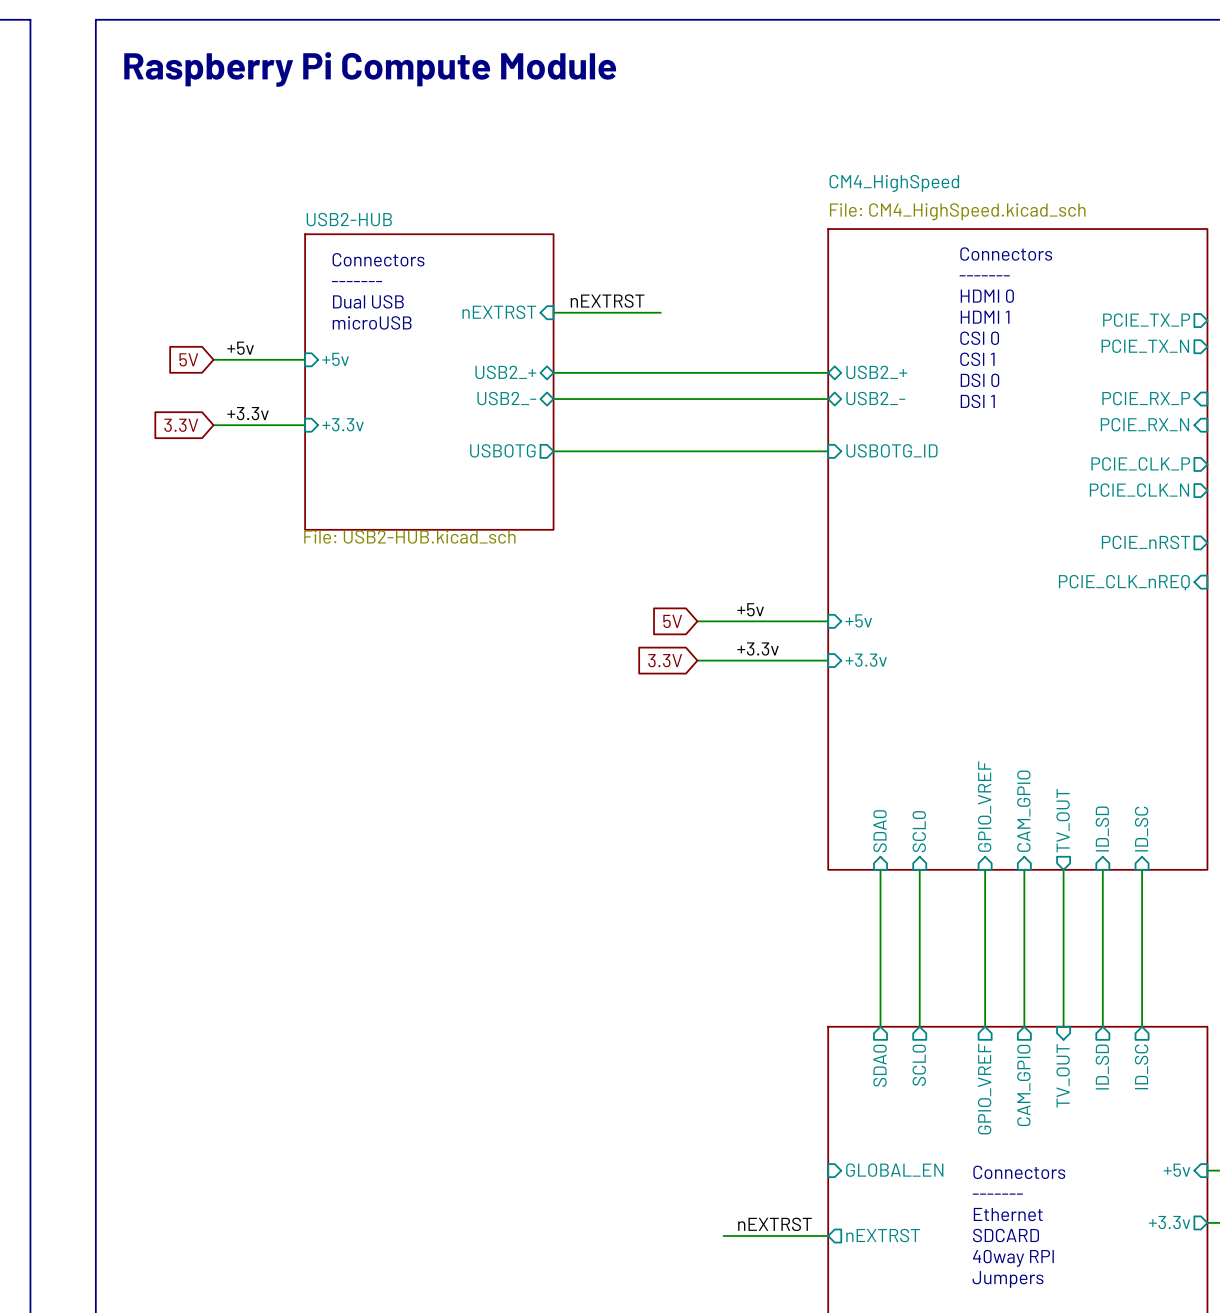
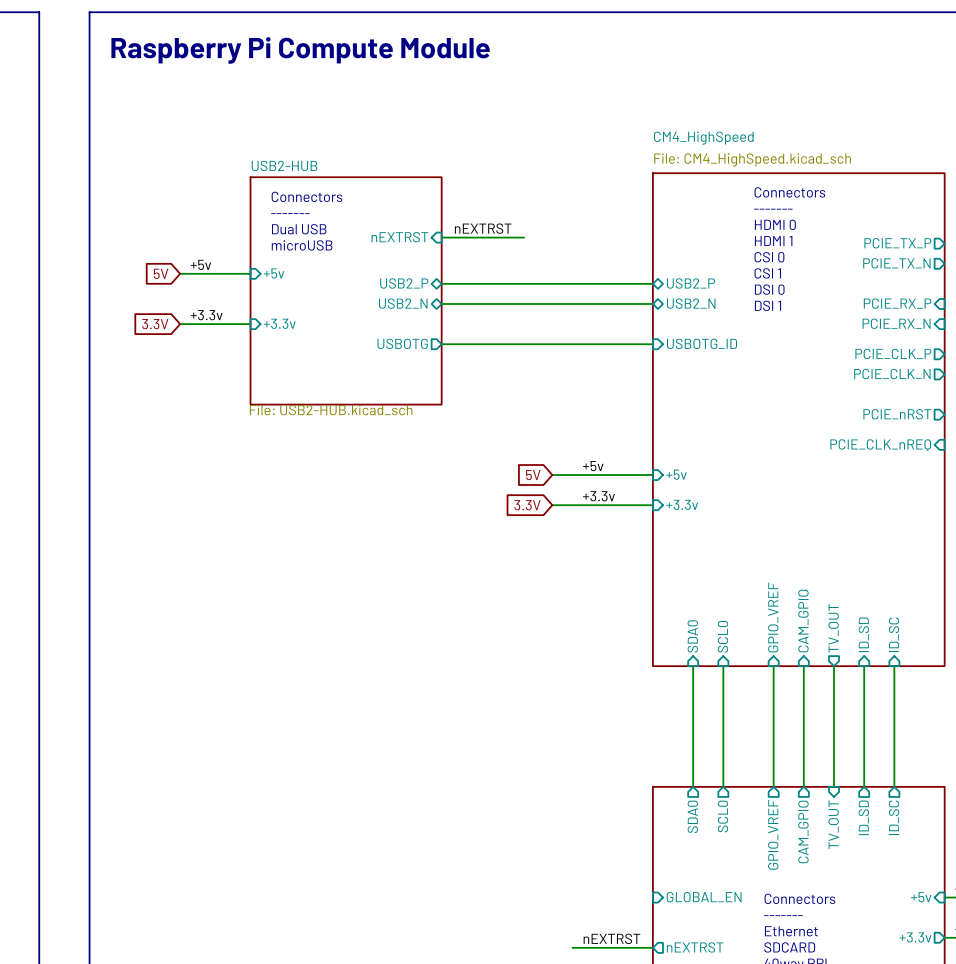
sheet pin: USB2_+ (505, 372) -> USB2_P (404, 283)
sheet pin: USB2_+ (876, 372) -> USB2_P (690, 283)
sheet pin: USB2_- (506, 398) -> USB2_N (403, 303)
sheet pin: USB2_- (875, 398) -> USB2_N (691, 303)

